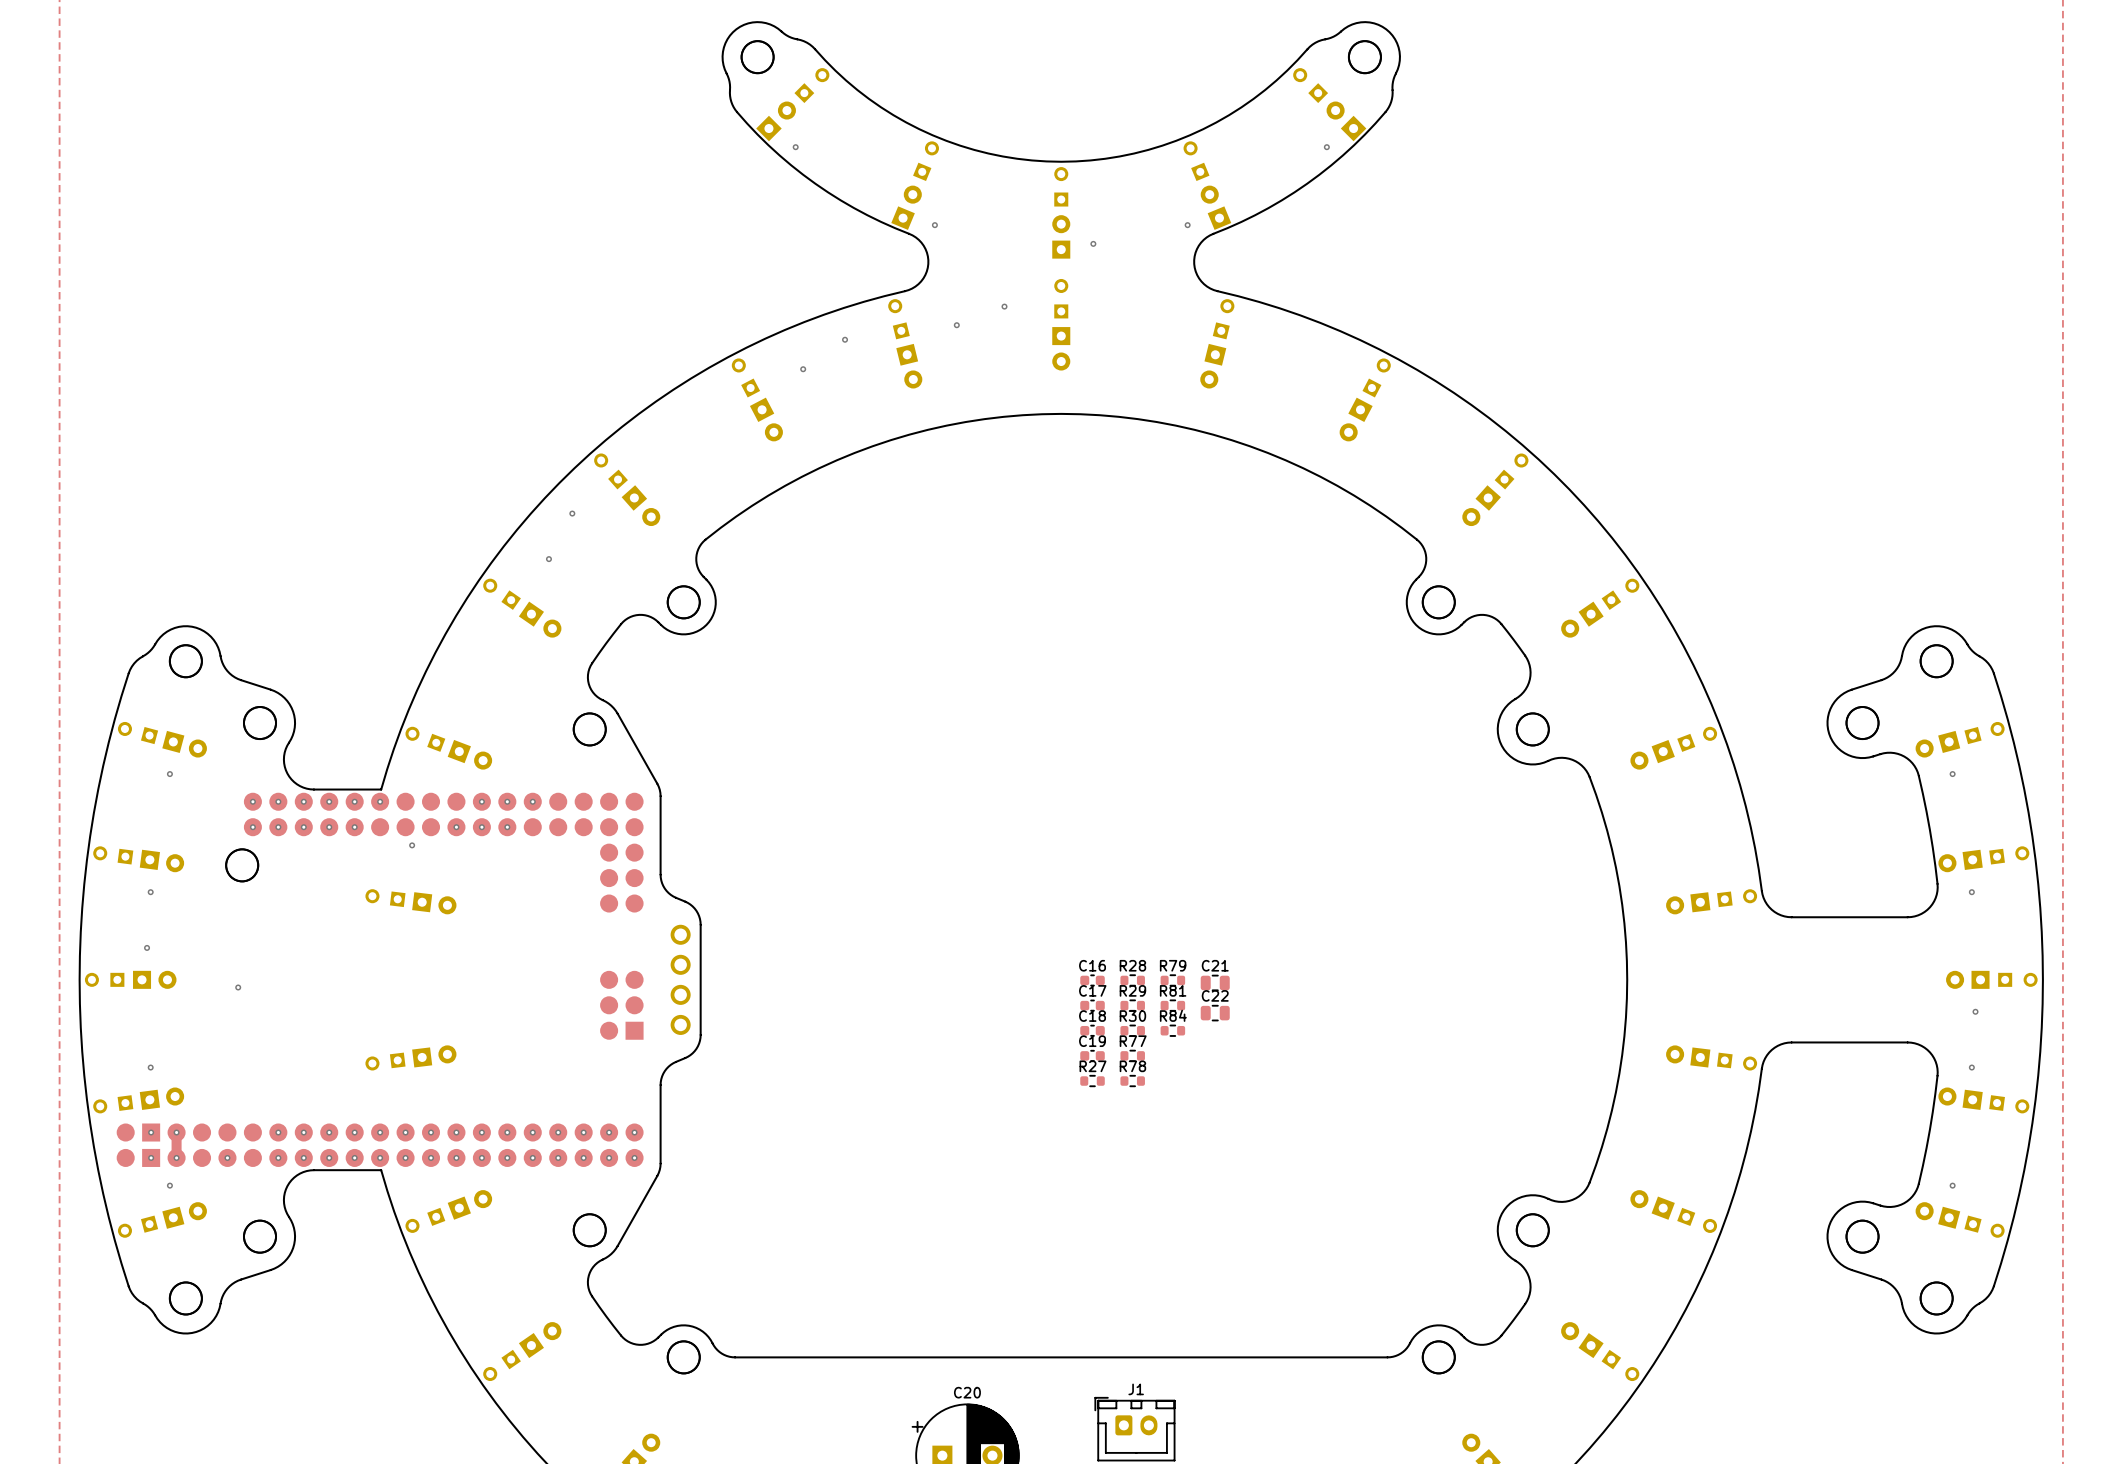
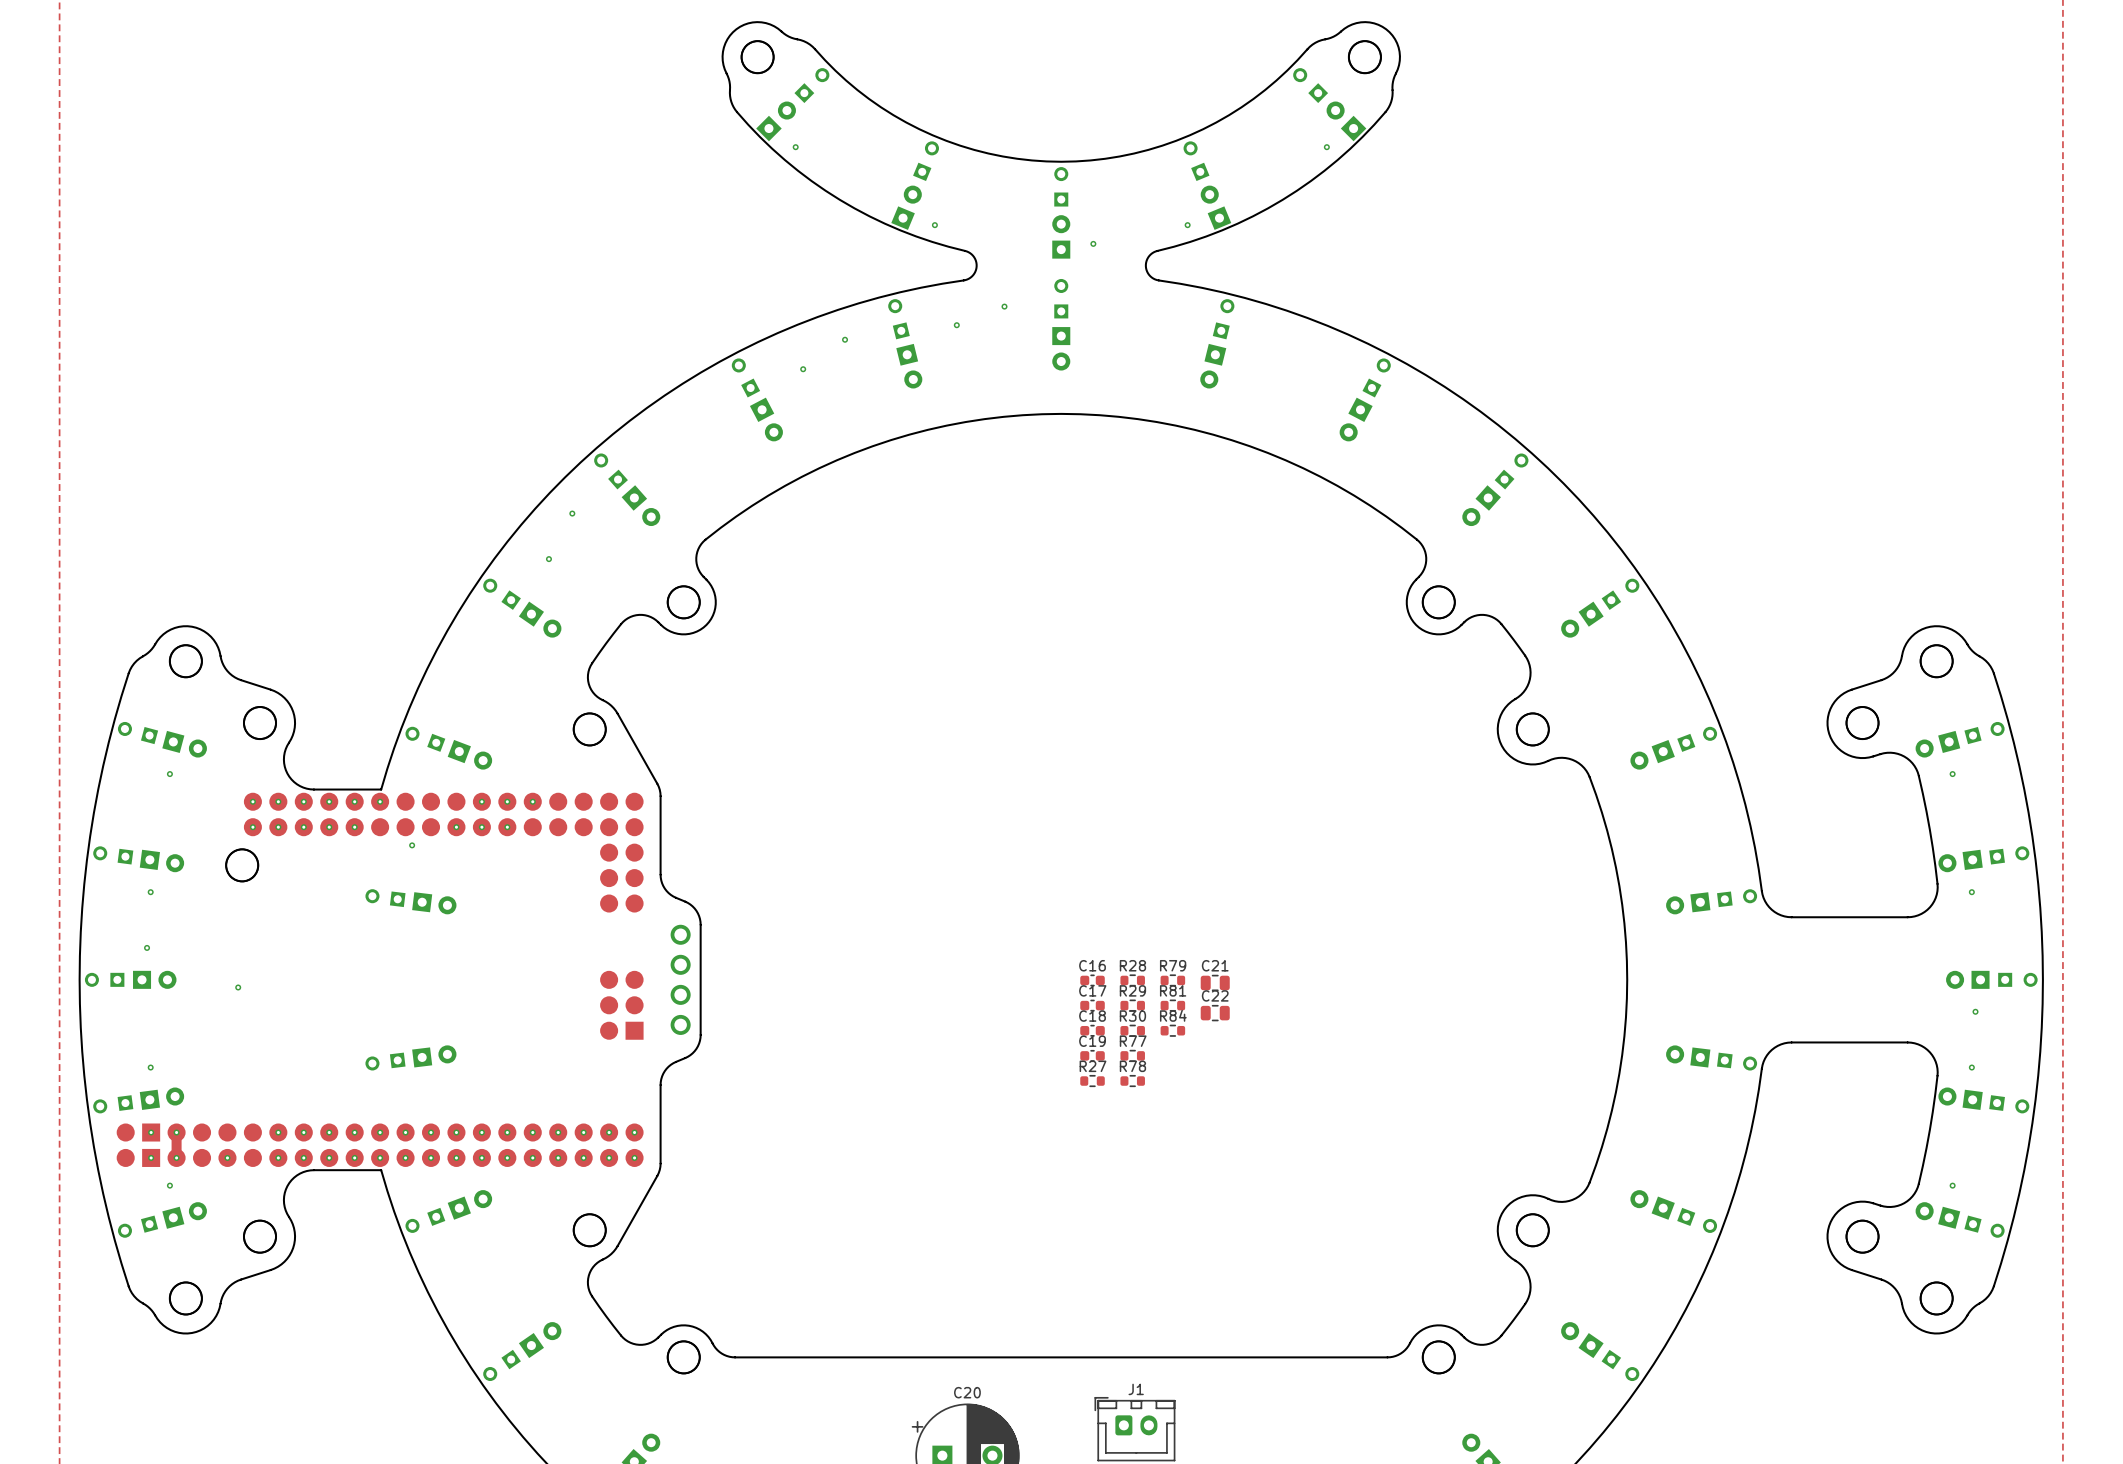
board edge: (730, 90) (731, 101) (737, 112) (757, 134) (791, 165) (840, 200) (918, 239) (927, 256) (925, 275) (918, 284) (908, 290) (824, 314) (765, 338) (727, 357) (655, 401) (622, 426) (574, 468) (517, 529) (491, 563) (456, 615) (417, 690) (400, 729) (381, 789) -> (729, 90) (733, 107) (748, 124) (772, 148) (811, 181) (854, 208) (884, 223) (916, 236) (968, 252) (975, 260) (975, 271) (965, 280) (900, 292) (838, 309) (758, 342) (682, 383) (629, 420) (596, 448) (535, 508) (507, 541) (469, 594) (436, 649) (418, 688) (401, 728) (381, 789)
board edge: (1392, 90) (1391, 101) (1385, 112) (1364, 134) (1331, 165) (1281, 200) (1203, 239) (1194, 256) (1197, 275) (1204, 284) (1213, 290) (1259, 301) (1320, 322) (1379, 349) (1417, 370) (1471, 405) (1505, 431) (1554, 474) (1584, 505) (1638, 572) (1661, 608) (1693, 665) (1719, 724) (1740, 785) (1750, 827) (1763, 897) (1774, 911) (1791, 917) -> (1392, 90) (1388, 107) (1374, 124) (1350, 148) (1310, 181) (1267, 208) (1237, 223) (1206, 236) (1153, 252) (1146, 260) (1147, 271) (1156, 280) (1223, 292) (1286, 310) (1328, 325) (1387, 353) (1444, 386) (1480, 411) (1515, 438) (1563, 483) (1621, 549) (1647, 585) (1681, 641) (1710, 700) (1733, 762) (1750, 826) (1763, 897) (1774, 911) (1791, 917)

